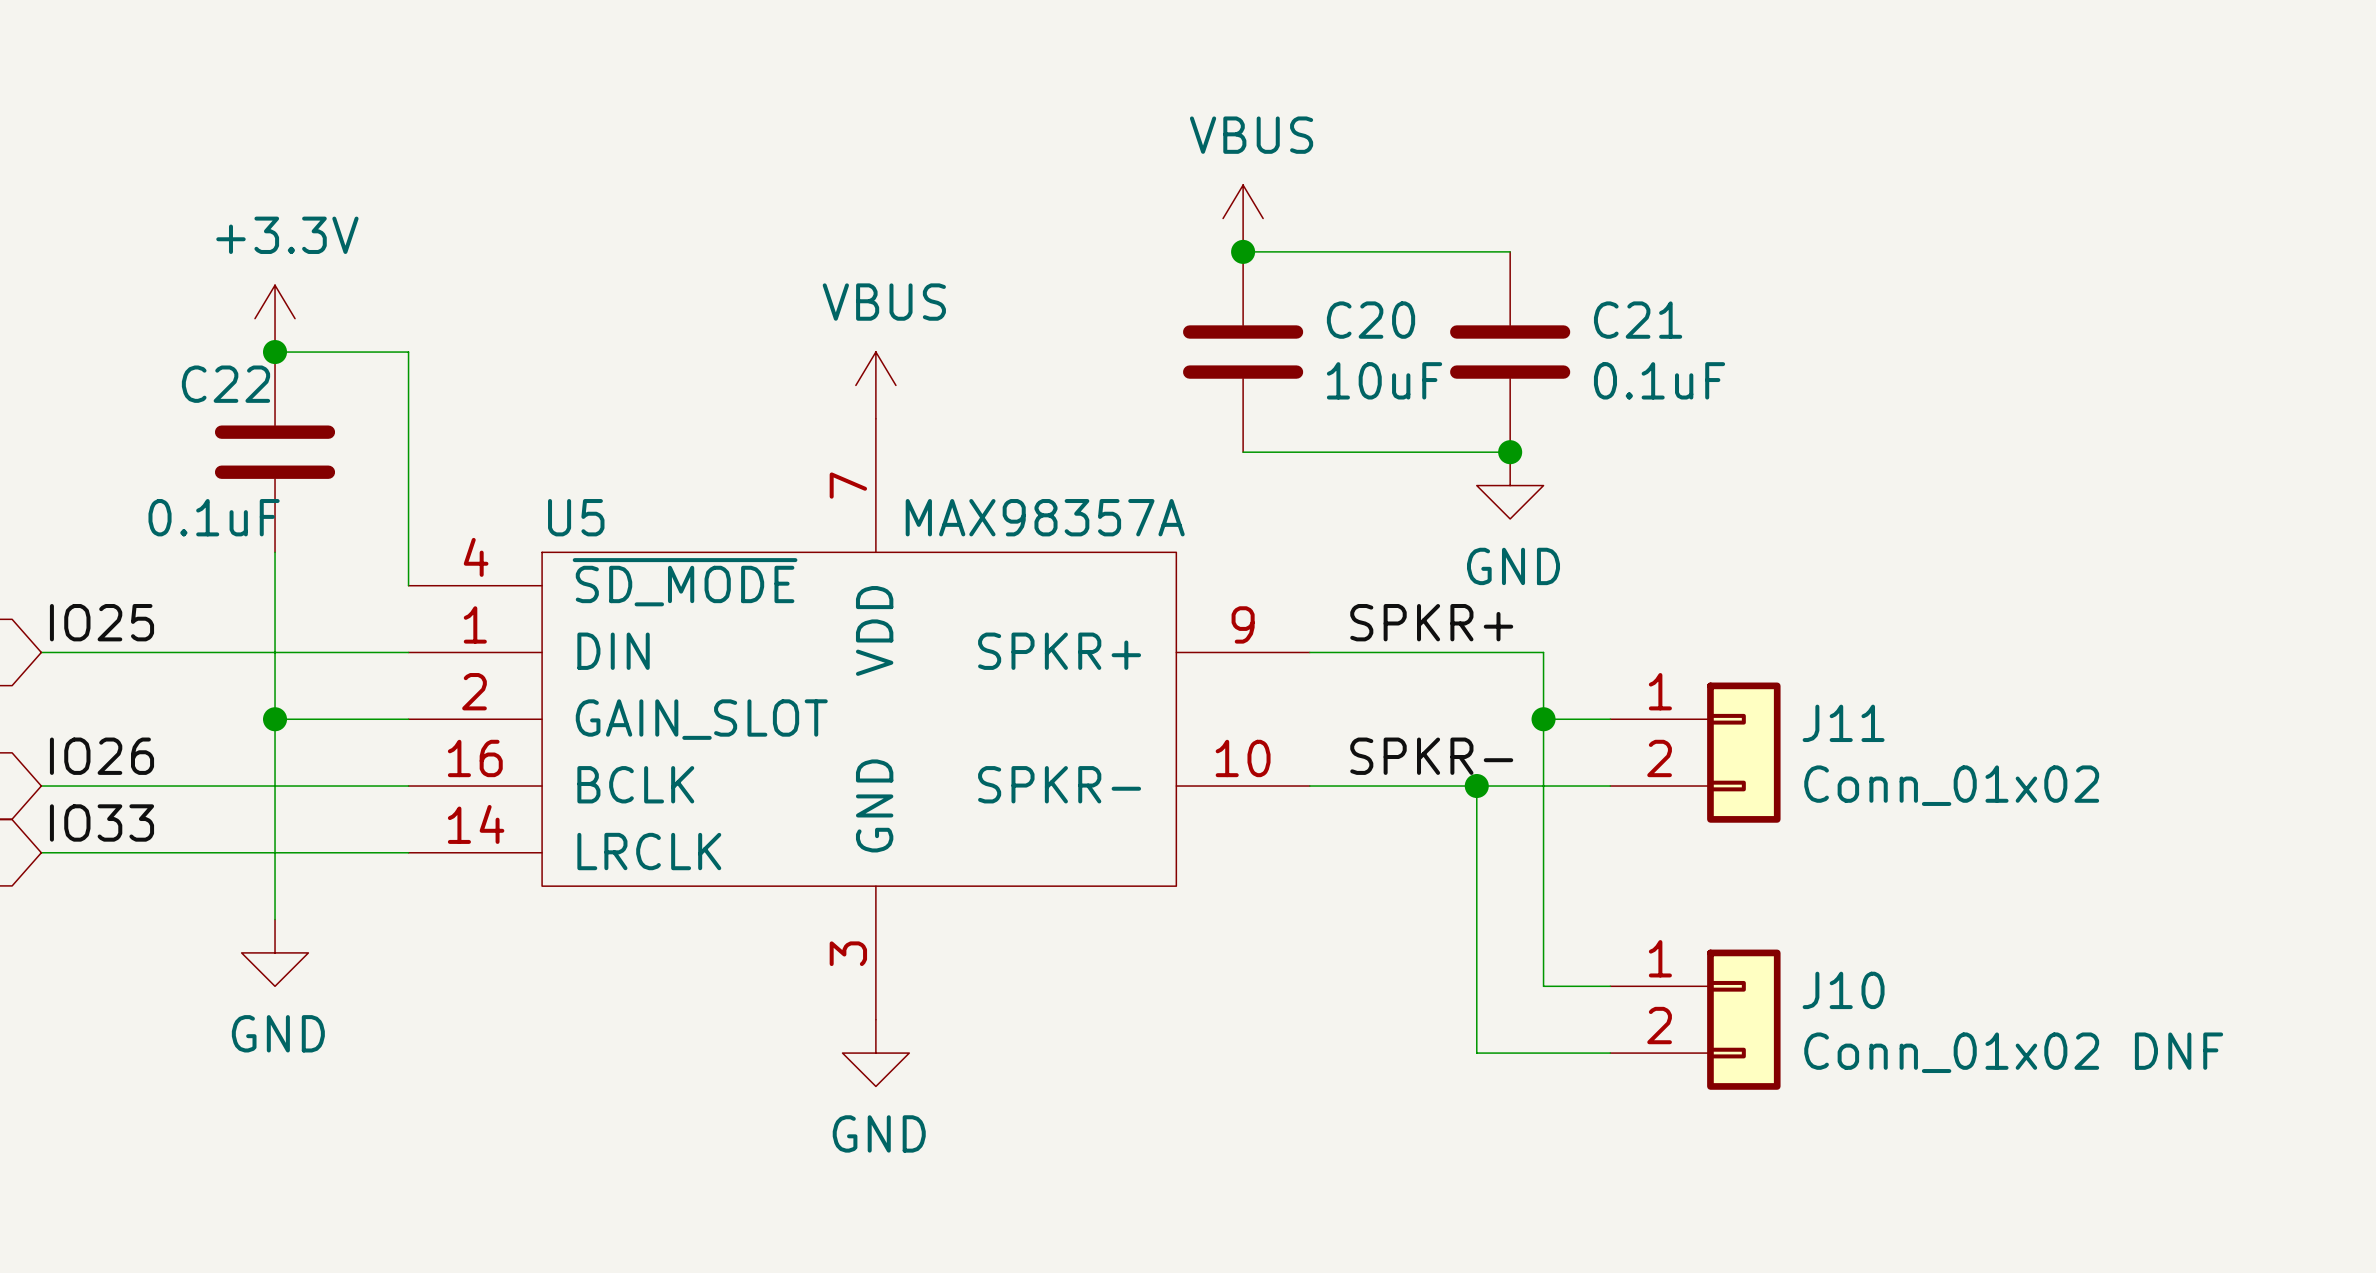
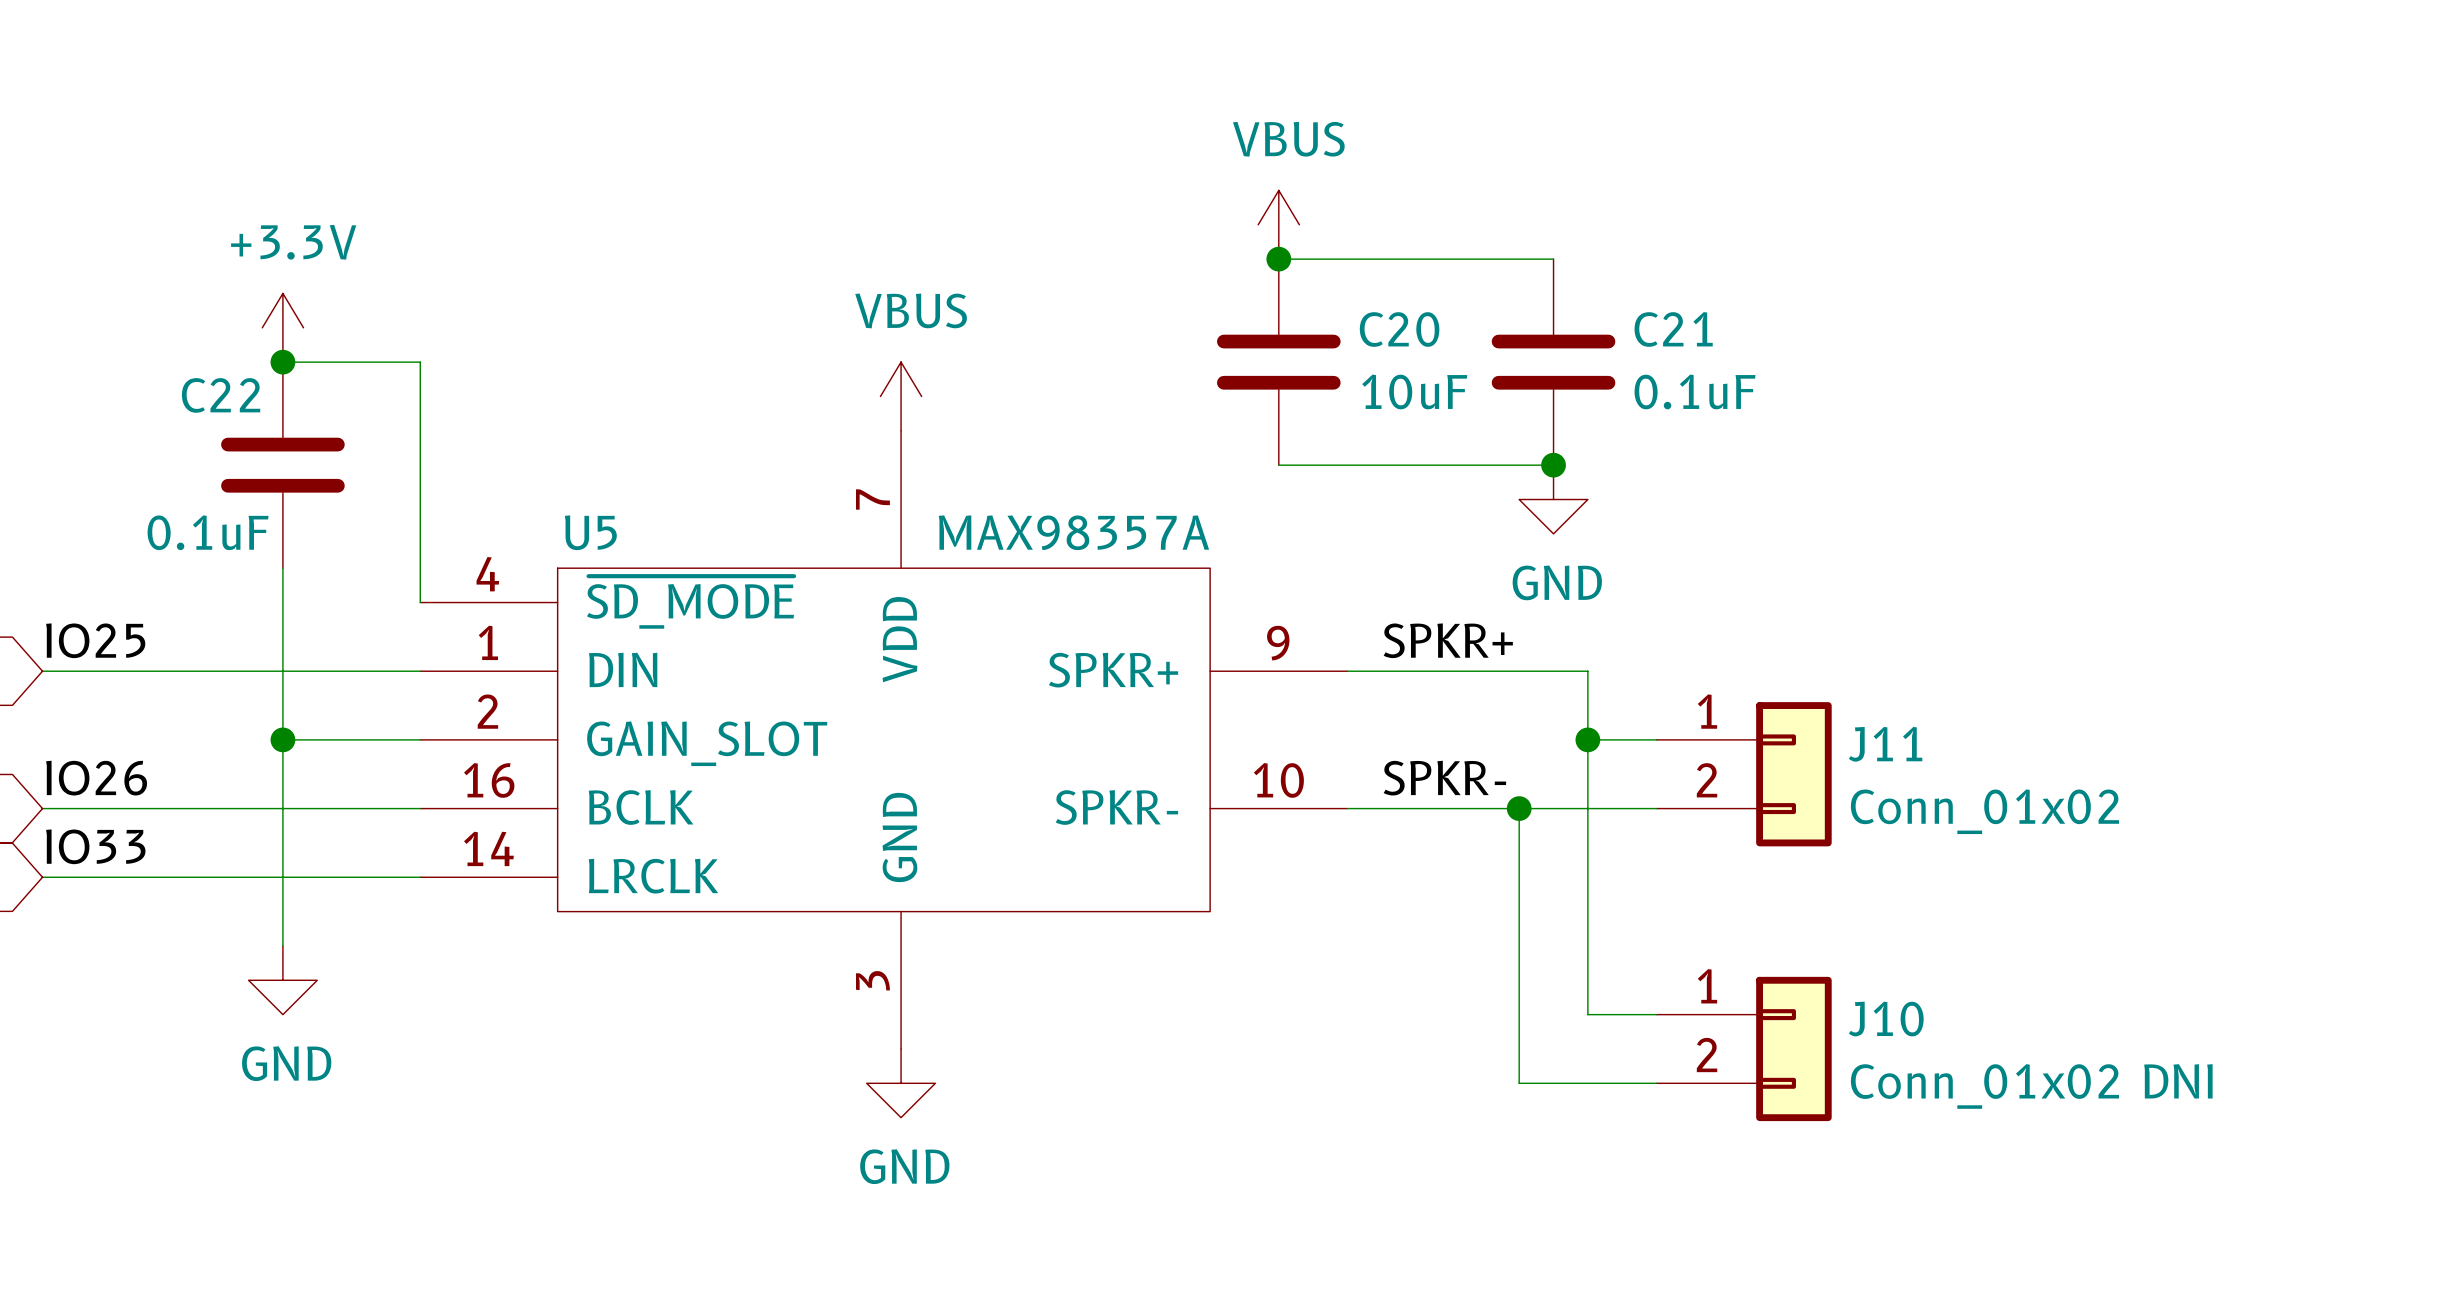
J10 value: Conn_01x02 DNF (2013, 1052) -> Conn_01x02 DNI (2031, 1086)

